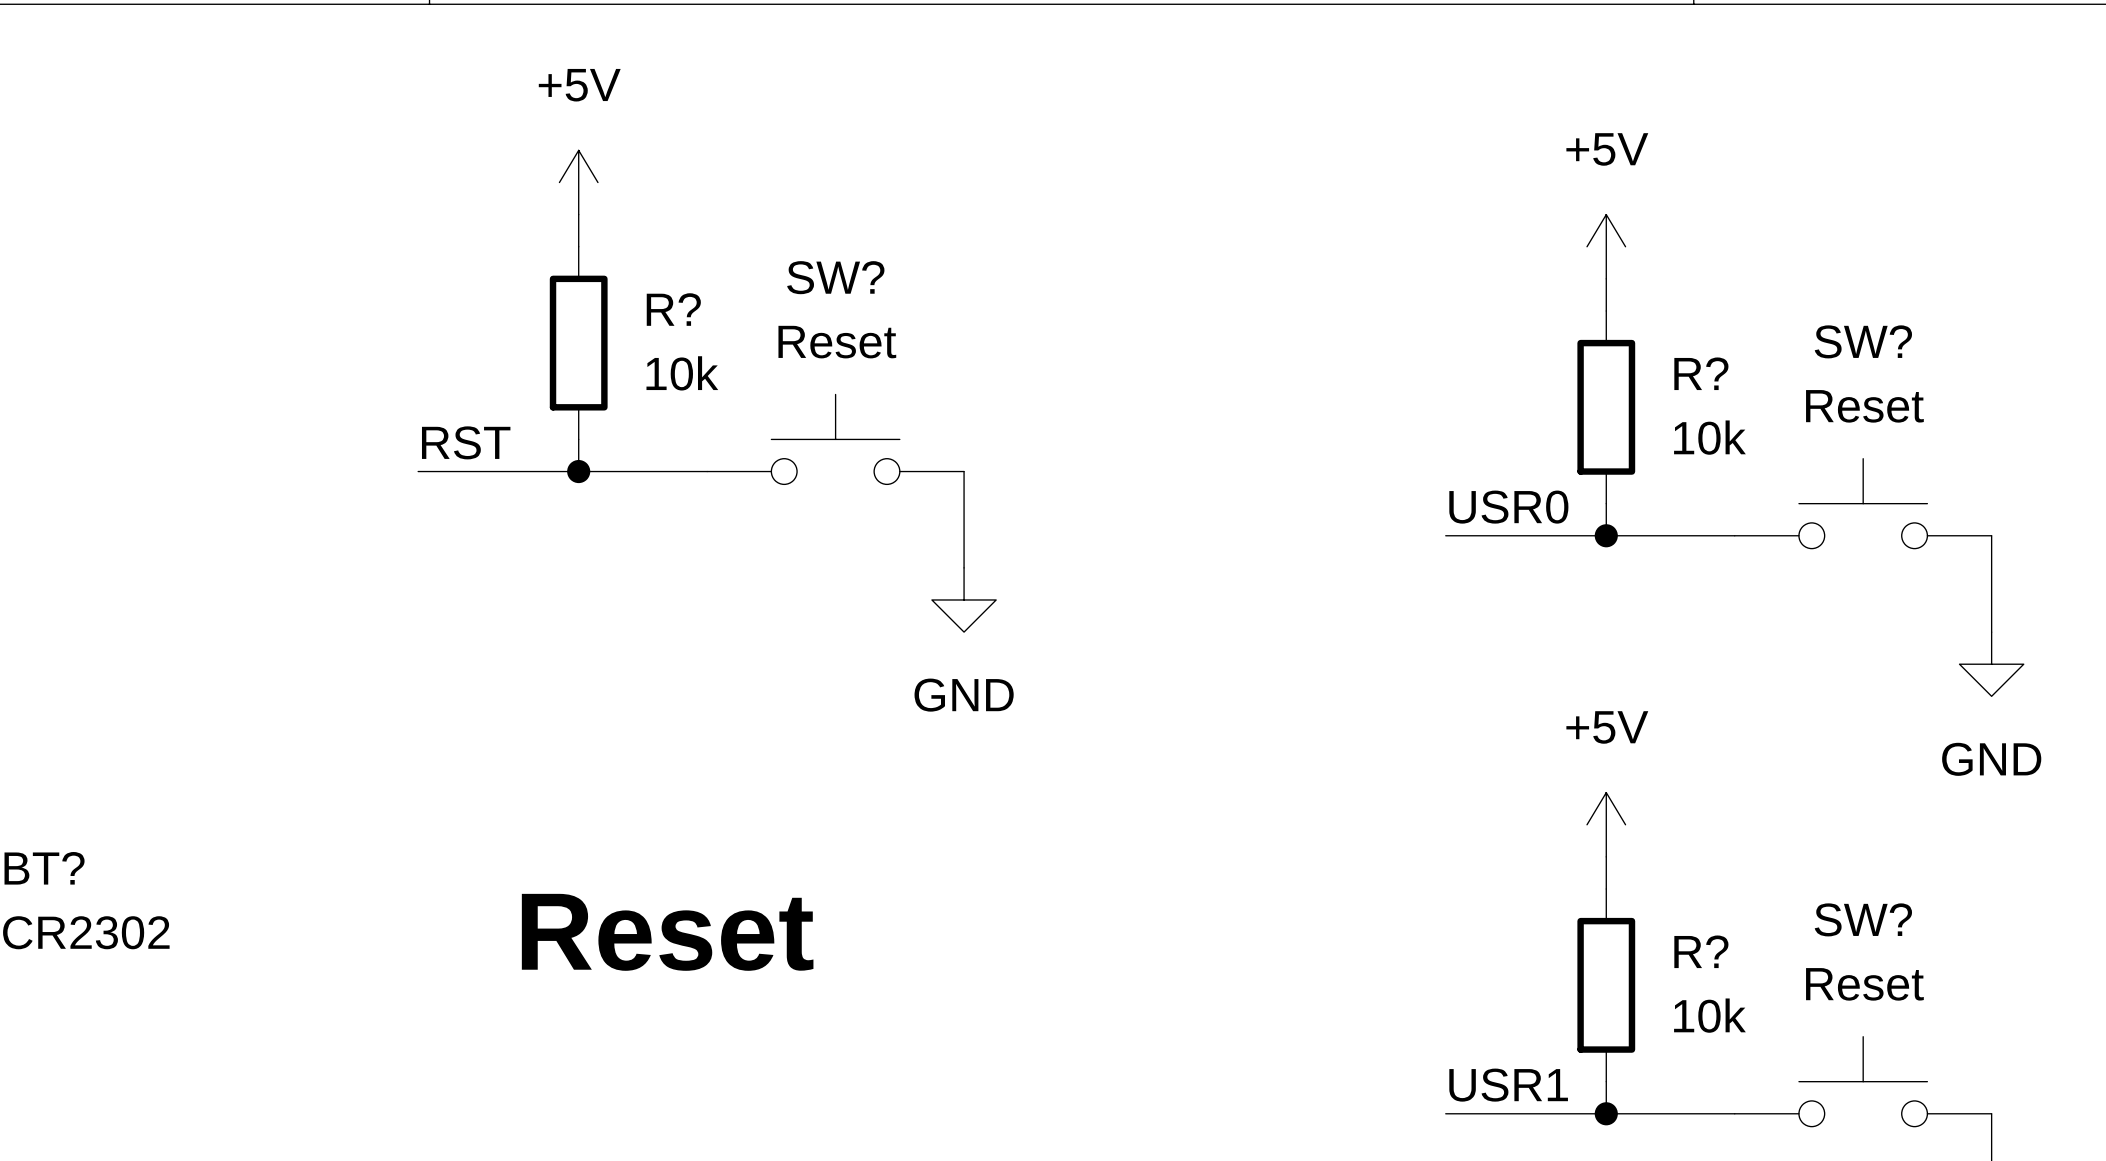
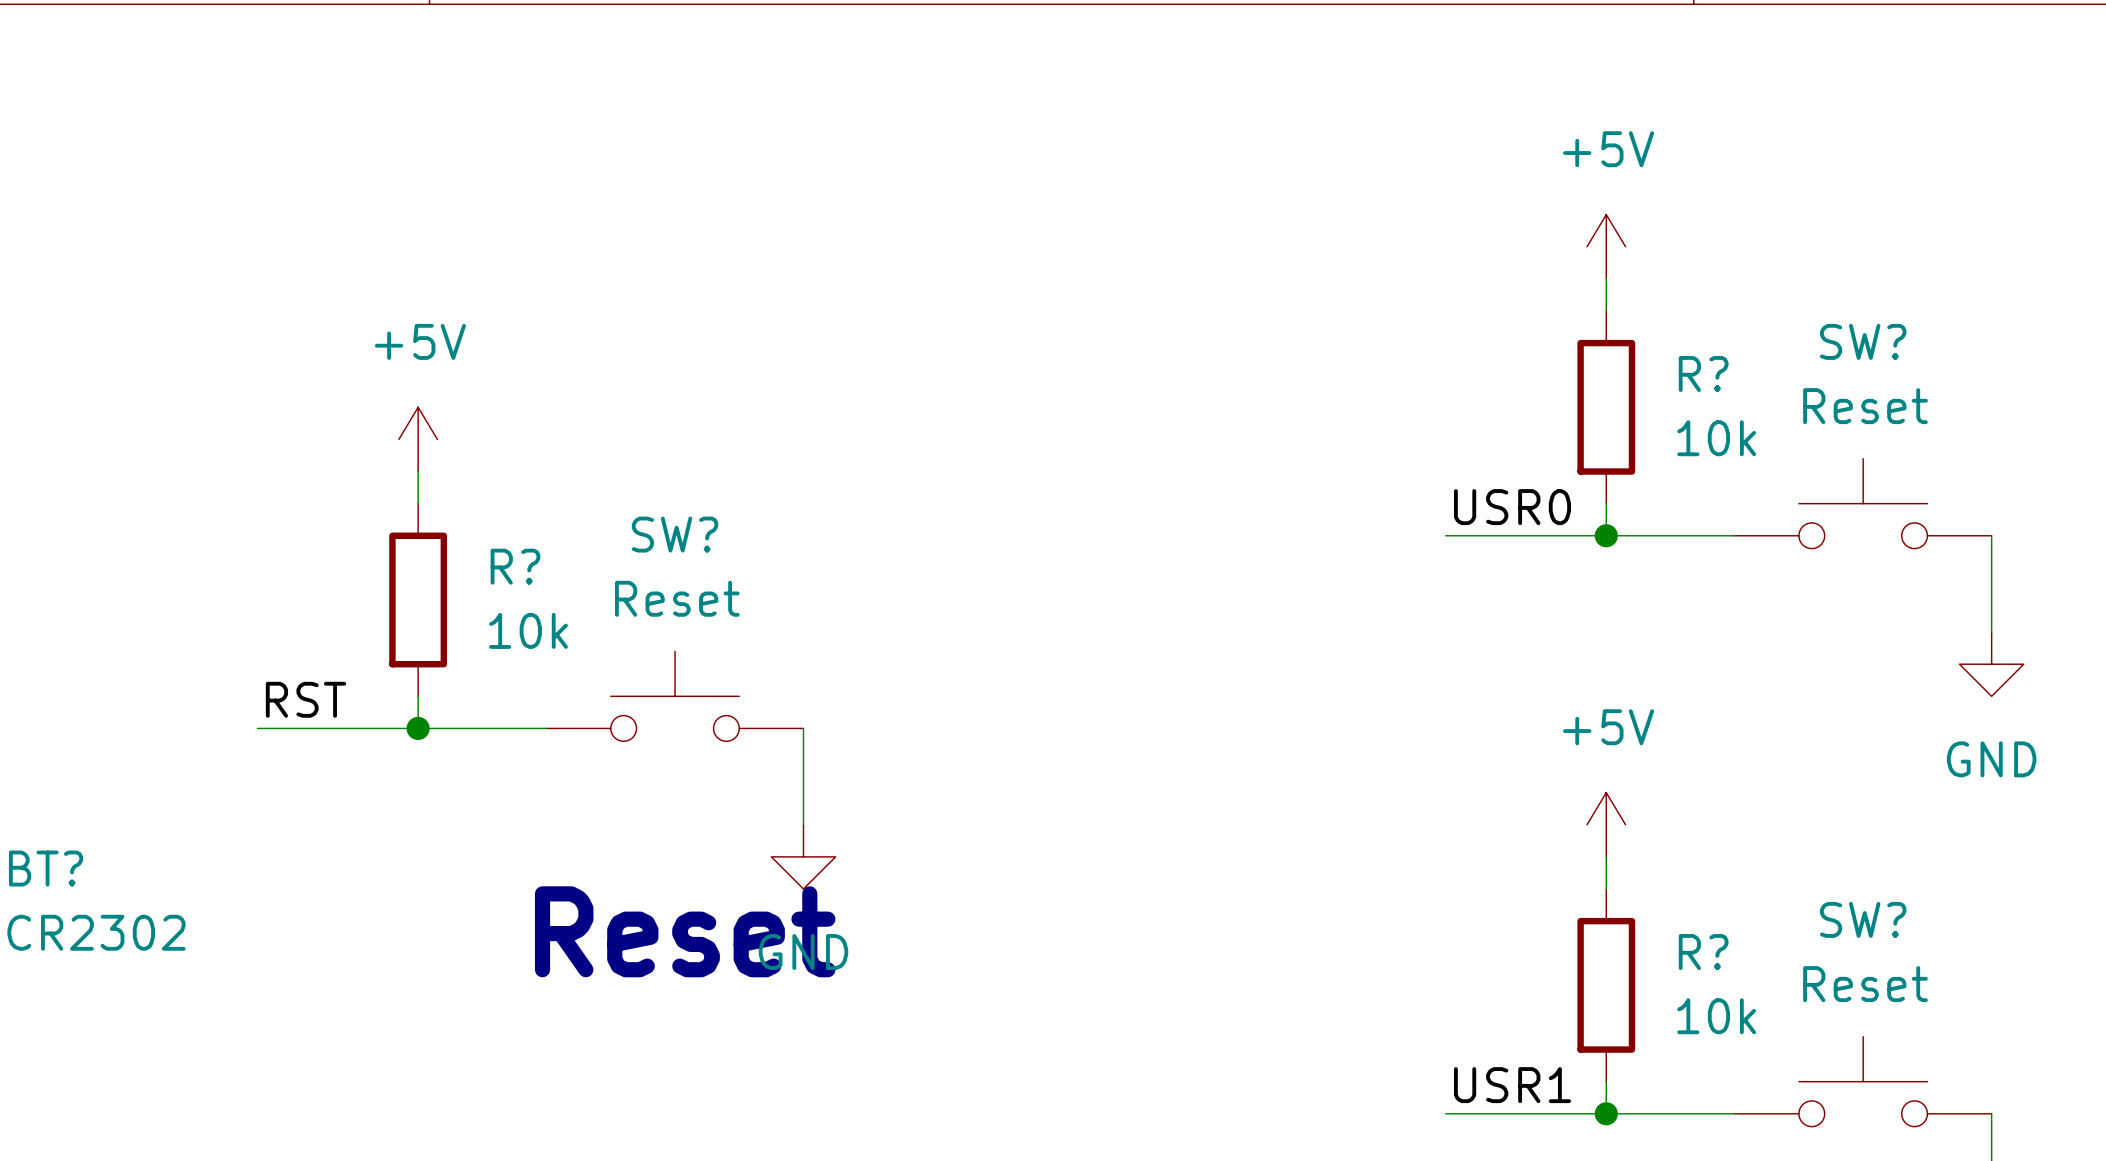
power symbol position: +5V (578, 182) -> +5V (418, 439)
wire: (578, 214) (578, 246) -> none
R? position: (578, 343) -> (418, 599)
wire: (578, 439) (578, 471) -> (418, 696) (418, 728)
SW? position: (835, 439) -> (675, 696)
label position: RST (466, 442) -> RST (305, 699)
wire: (418, 471) (707, 471) -> (418, 471) (418, 503)
junction: (578, 471) -> none
wire: (964, 471) (964, 567) -> (803, 728) (803, 824)
power symbol position: GND (964, 599) -> GND (803, 856)
wire: none -> (257, 728) (546, 728)
junction: none -> (418, 728)

